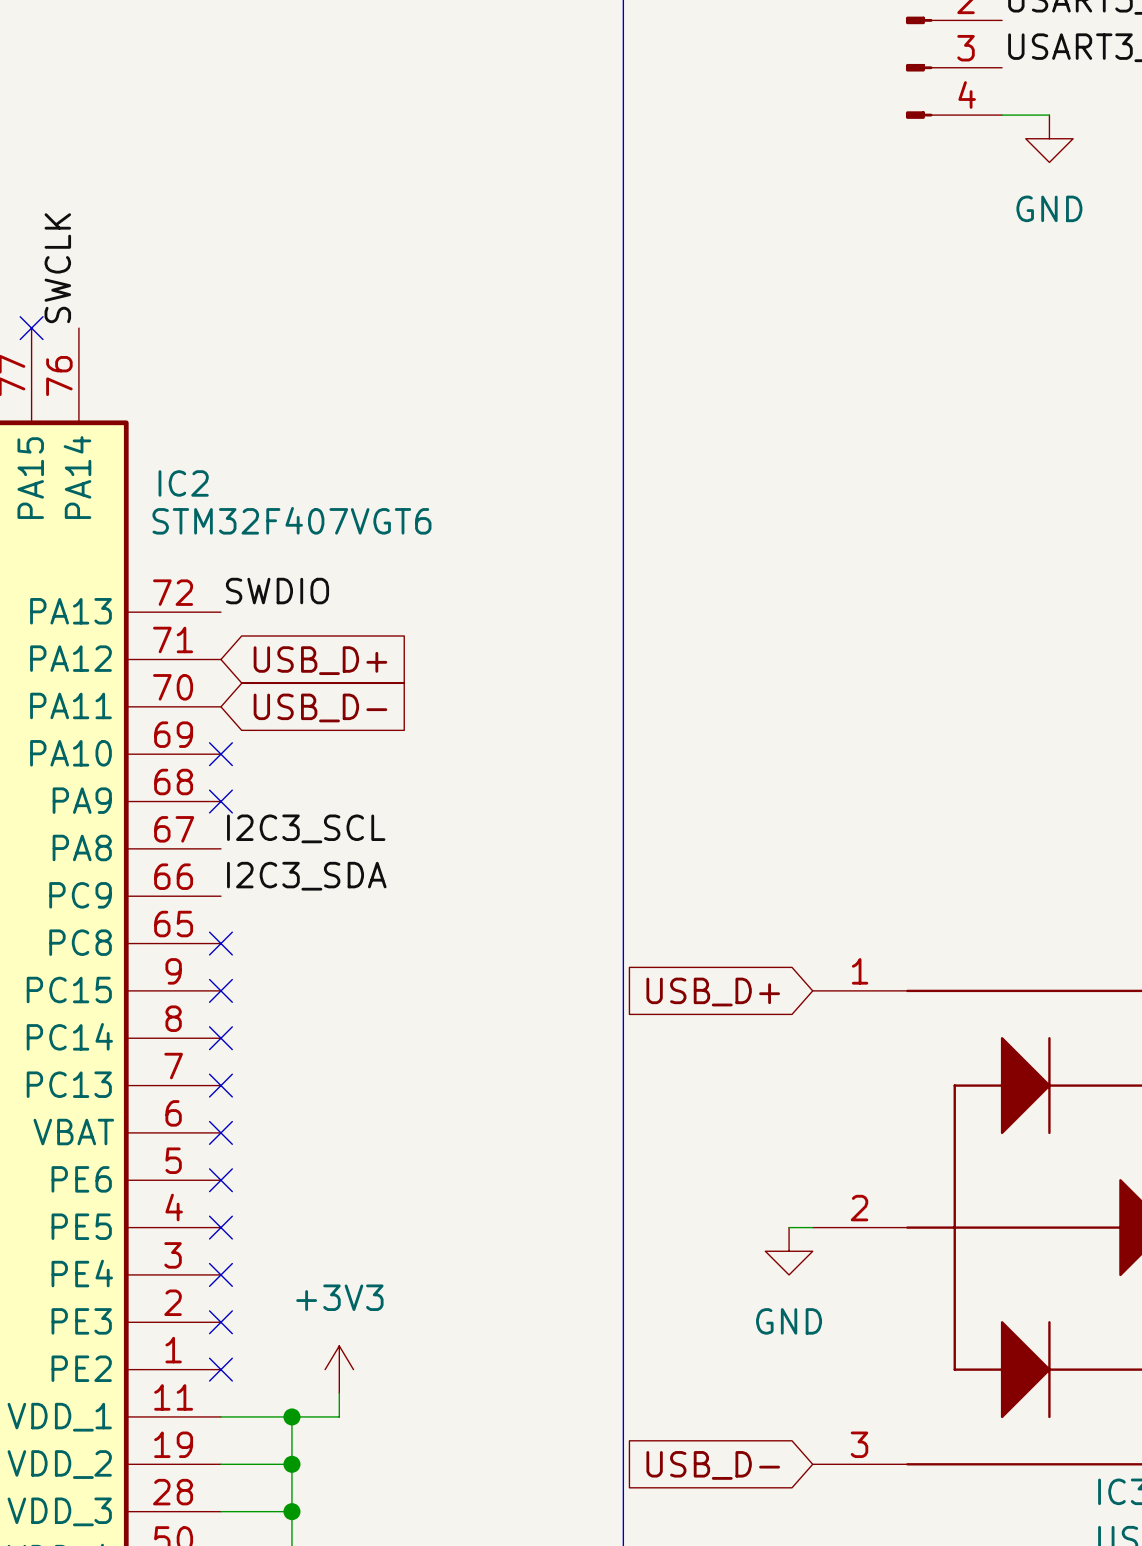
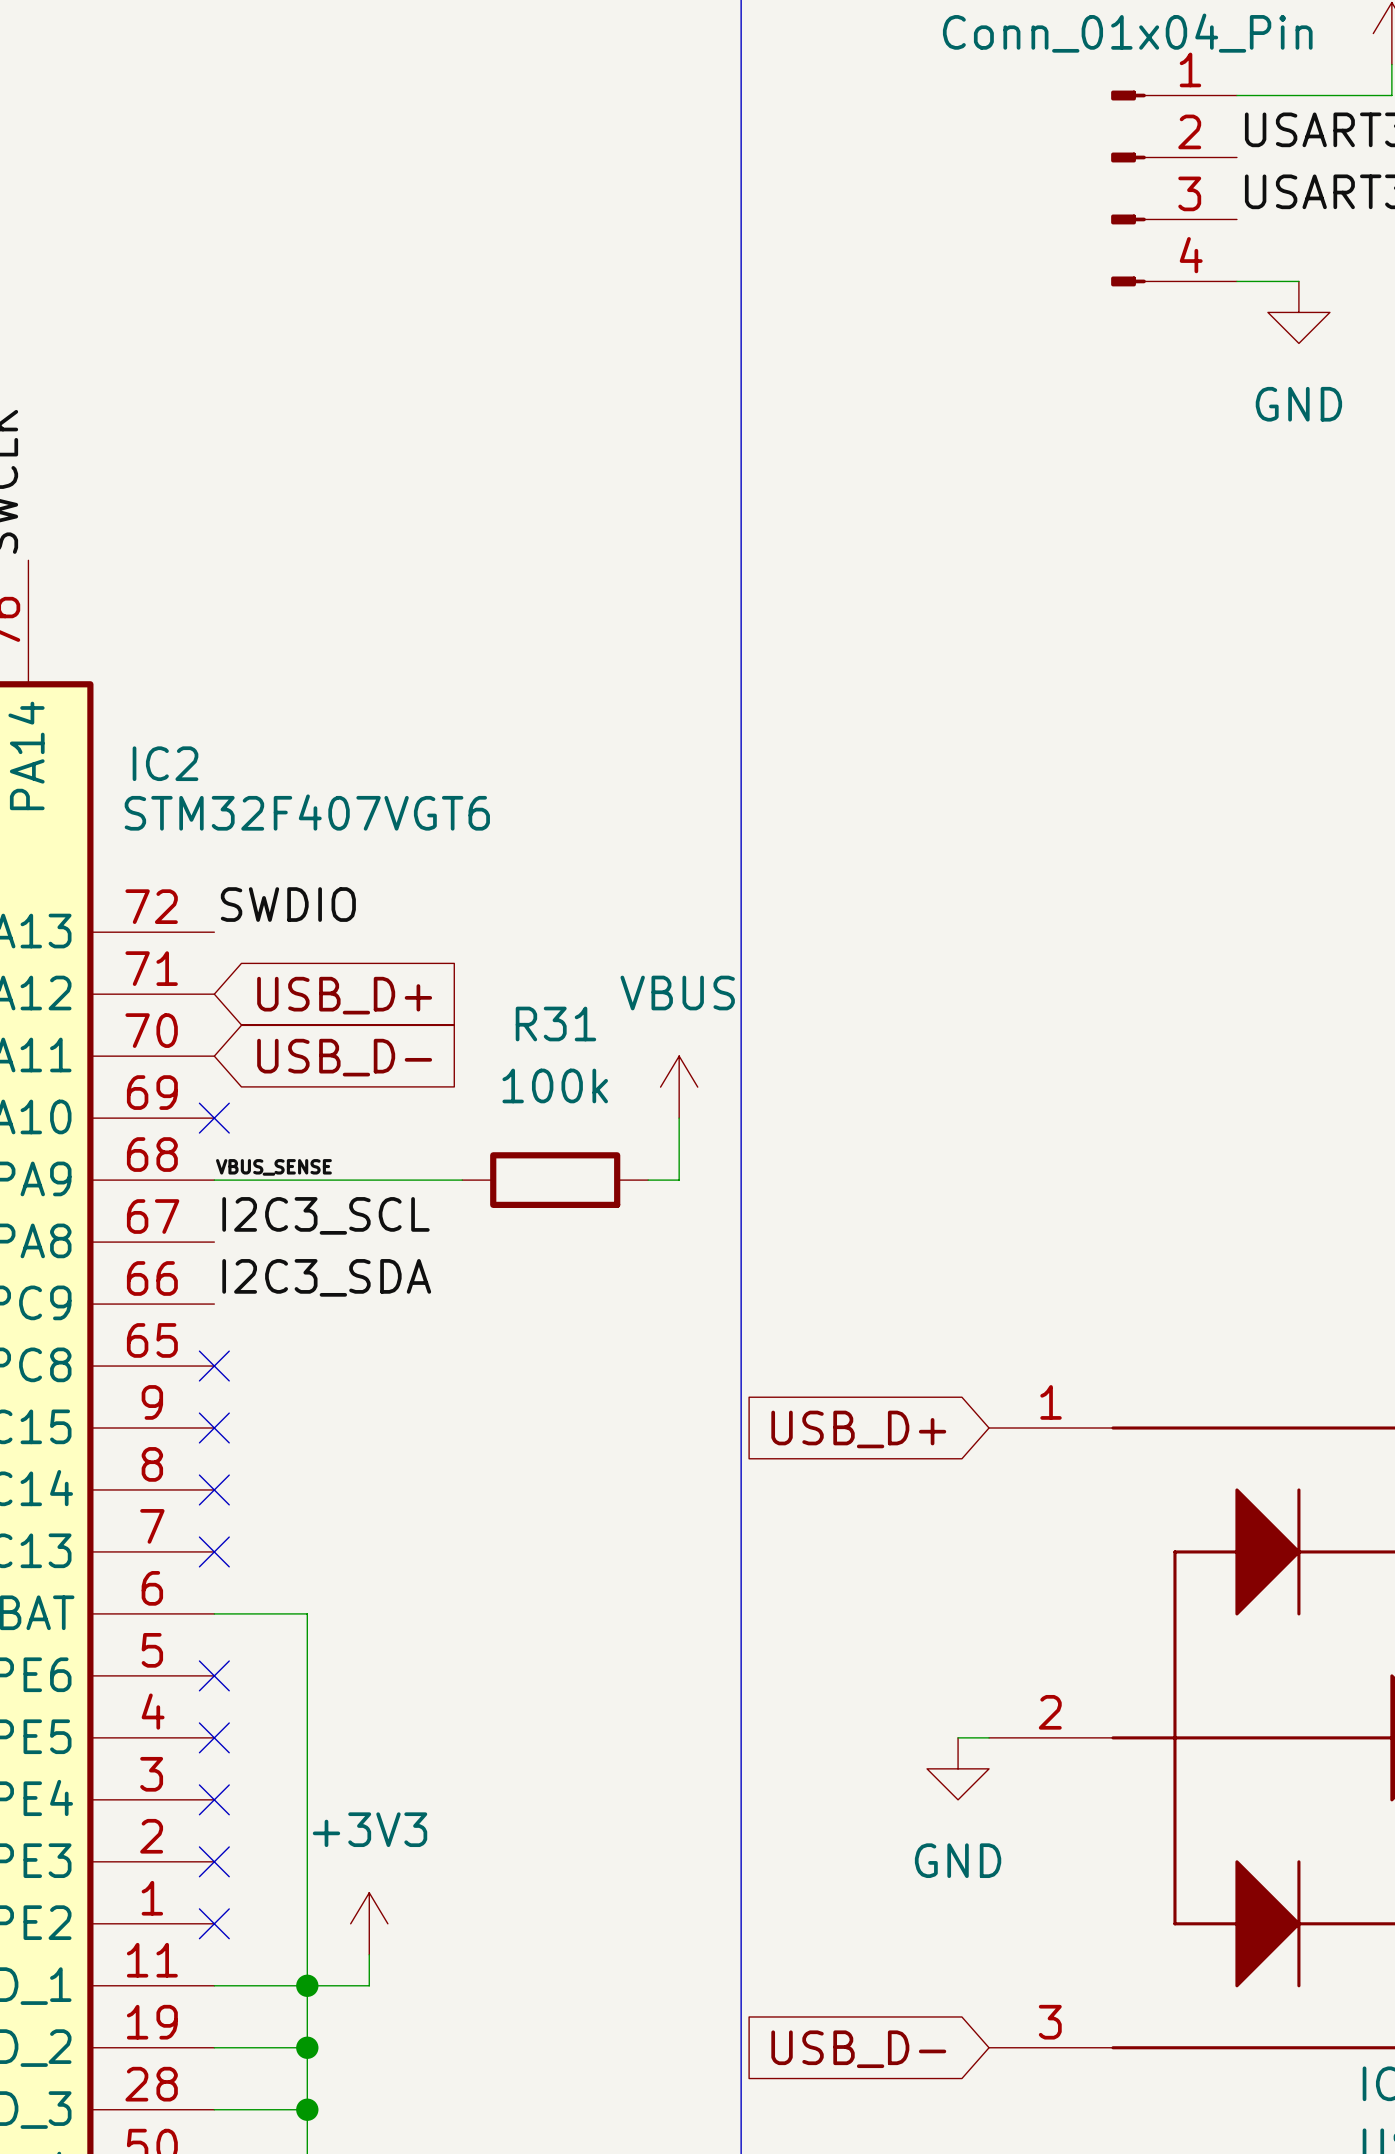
power symbol: none -> VBUS (679, 1087)
wire: none -> (679, 1118) (679, 1180) (648, 1180)
label: none -> VBUS_SENSE (273, 1167)
wire: none -> (214, 1180) (462, 1180)
no-connect mark: (220, 801) -> none
R31: none -> 100k (555, 1180)
wire: none -> (214, 1613) (307, 1613) (307, 1985)
no-connect mark: (220, 1132) -> none

